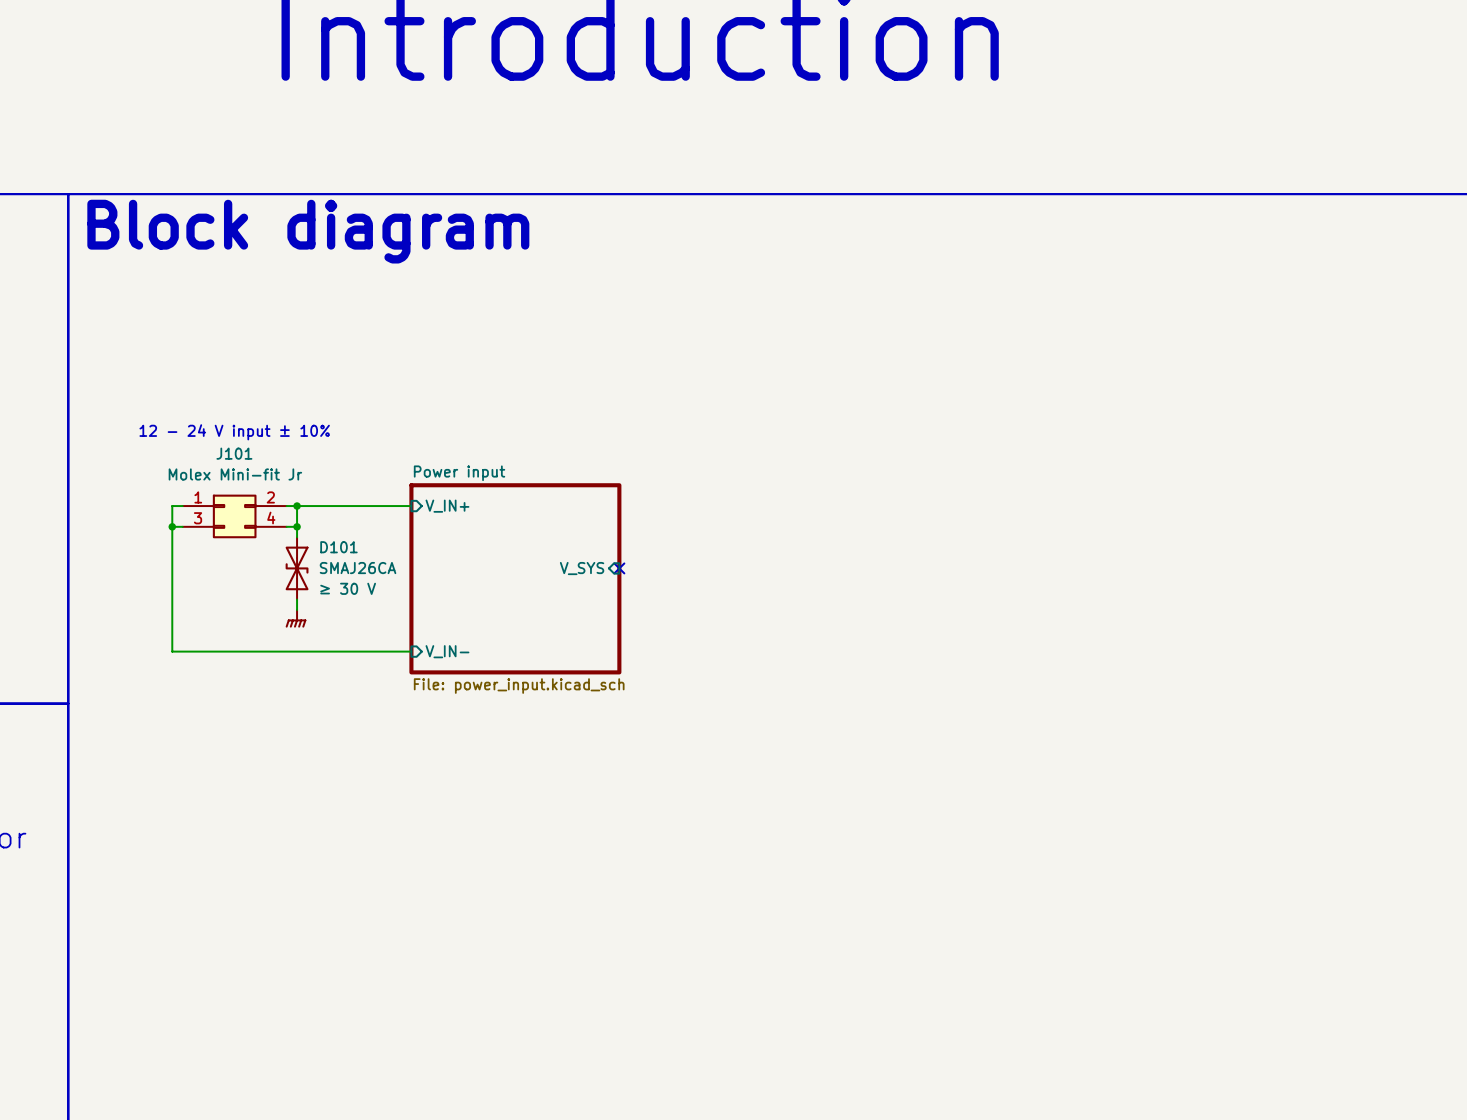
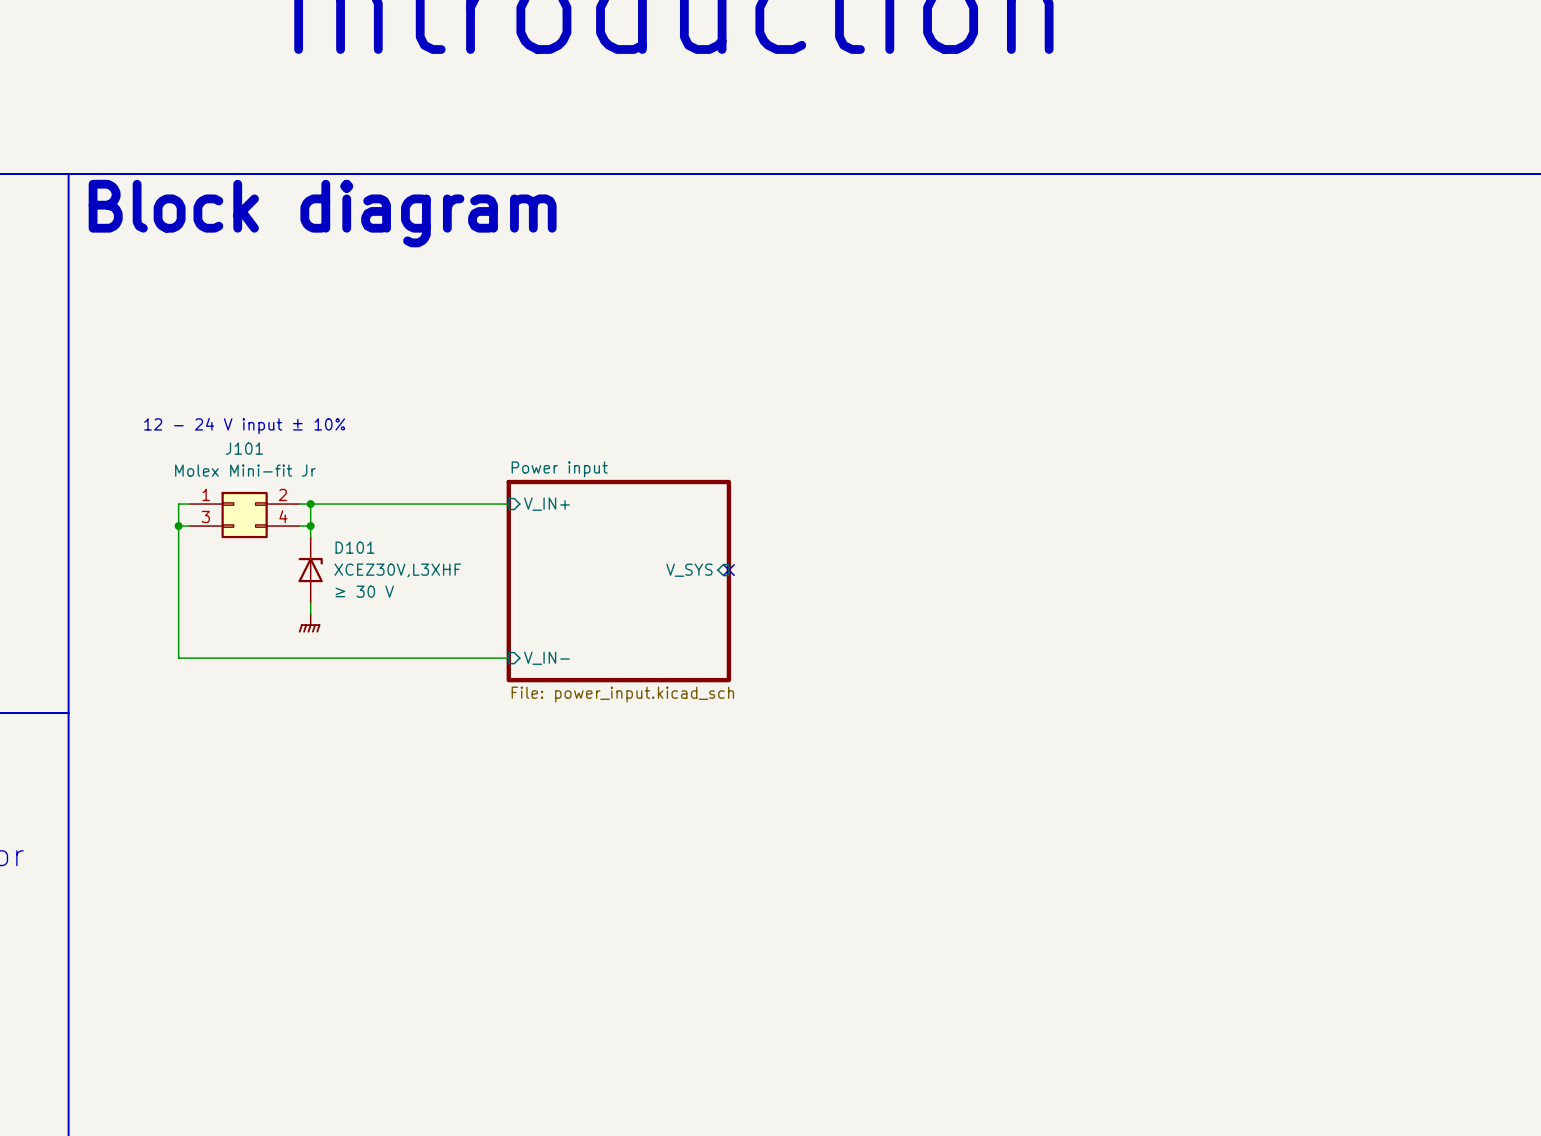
wire: none -> (431, 504) (508, 504)
sheet pin position: V_IN+ (447, 506) -> V_IN+ (546, 504)
D101 symbol: [285, 537, 309, 600] -> [298, 537, 323, 604]
D101 value: SMAJ26CA (358, 568) -> XCEZ30V,L3XHF (397, 570)
sheet pin position: V_SYS (582, 568) -> V_SYS (689, 570)
no-connect mark: (619, 568) -> none
no-connect mark: none -> (728, 570)
sheet Power input position: (515, 578) -> (618, 581)
wire: none -> (431, 658) (508, 658)
sheet pin position: V_IN- (447, 651) -> V_IN- (546, 658)

